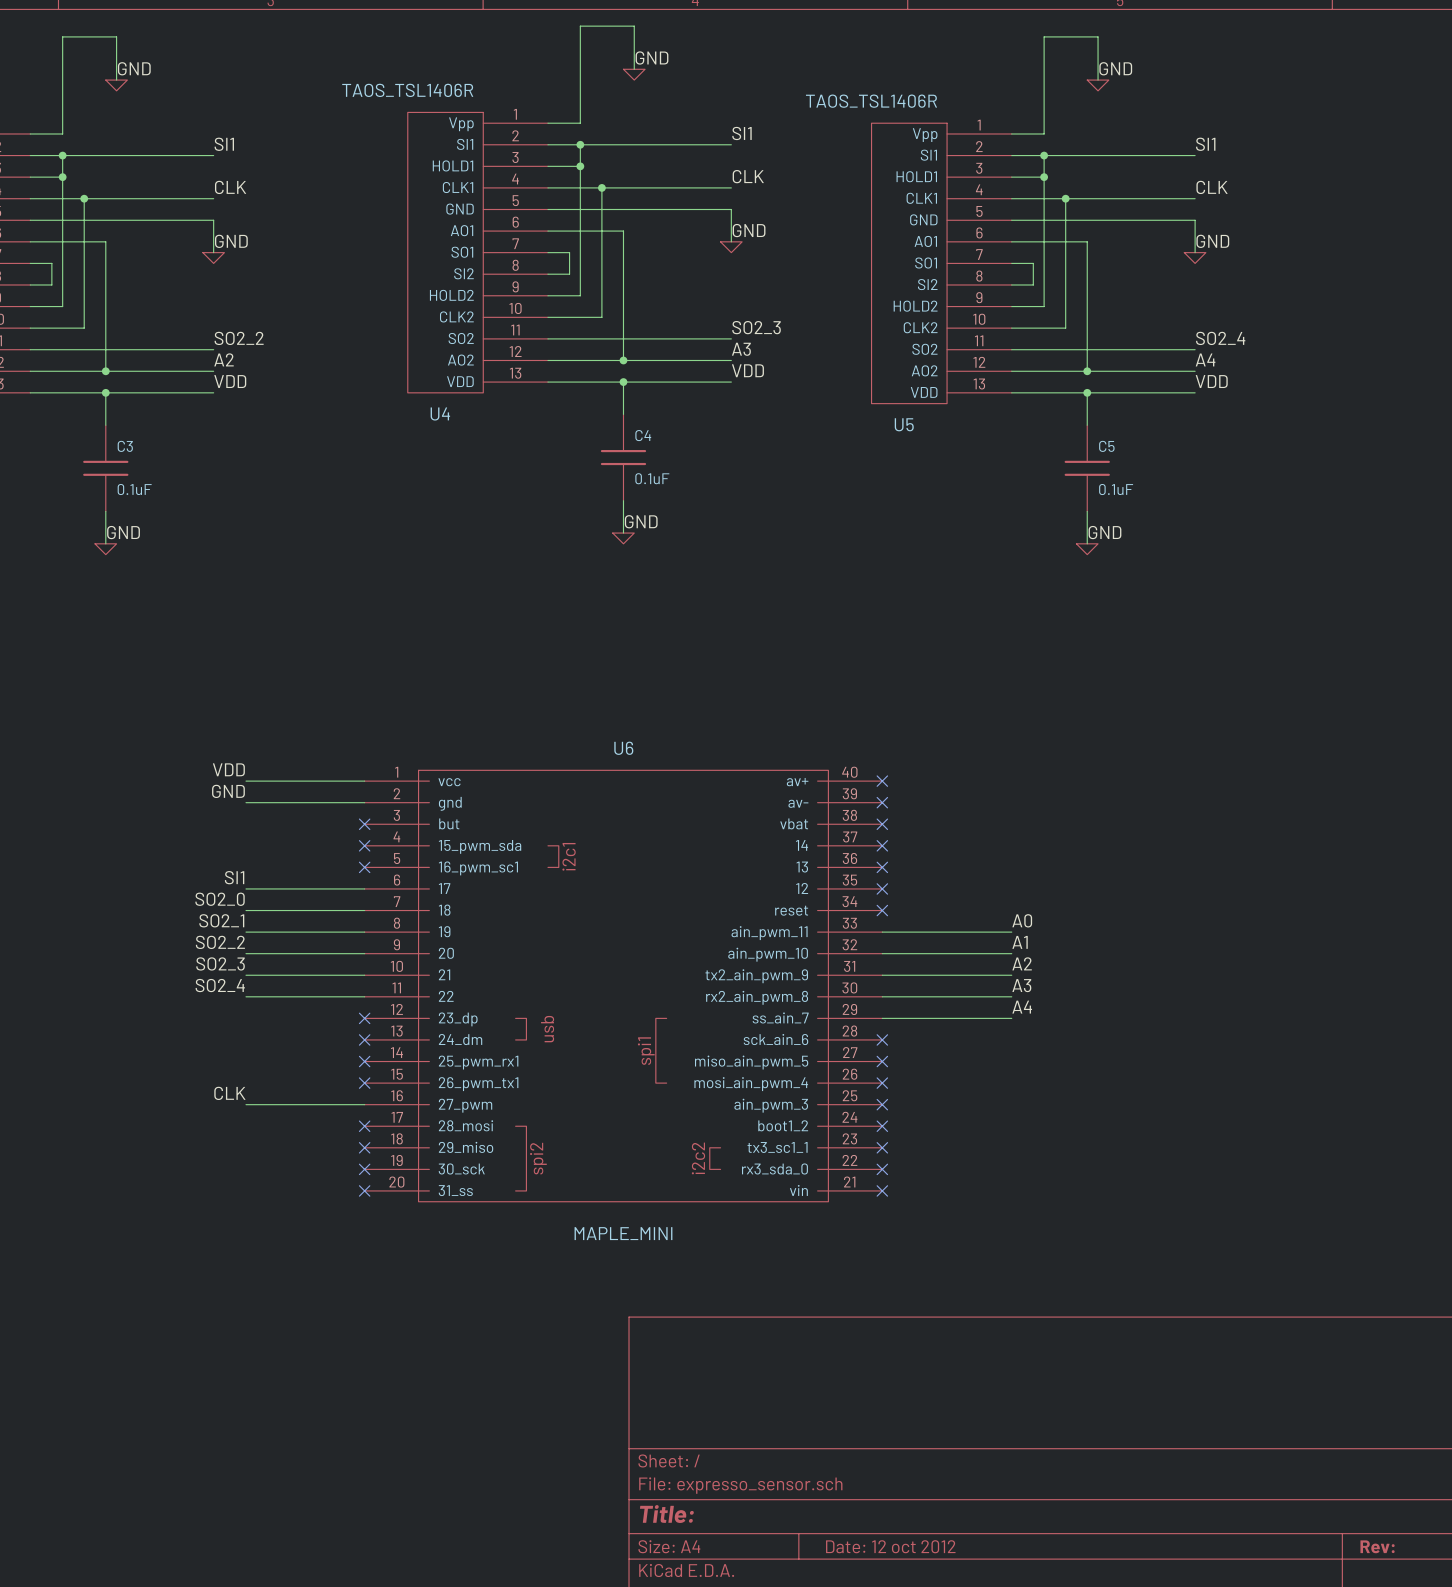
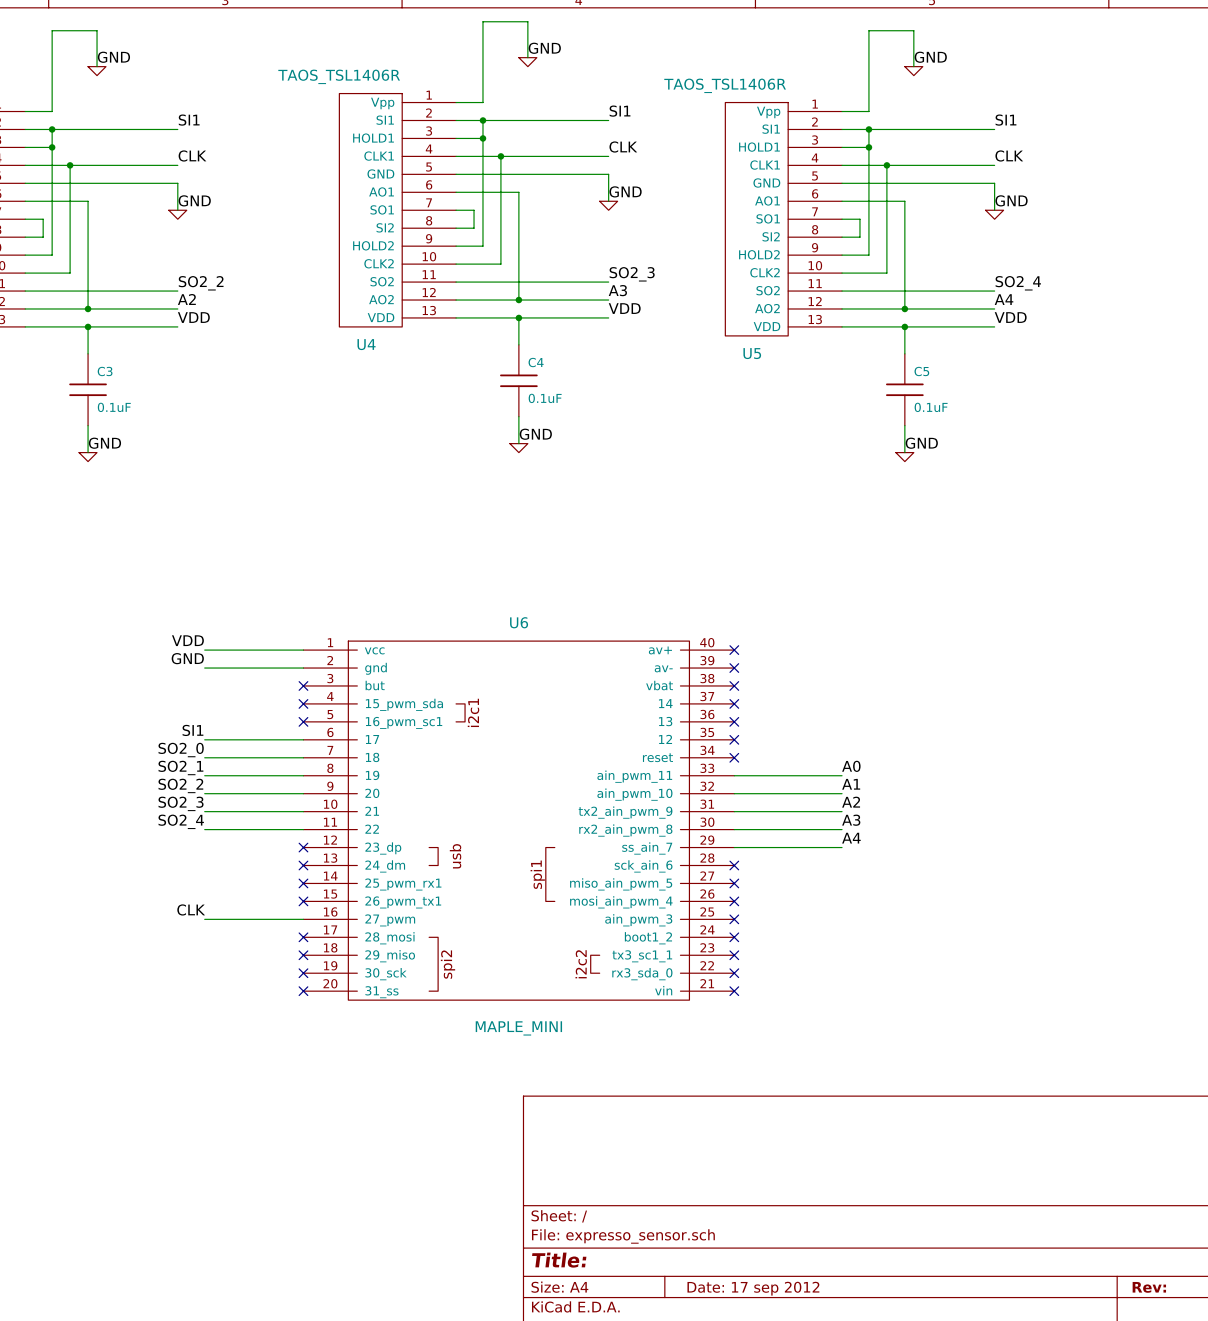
title block: Date: 12 oct 2012 (890, 1546) -> Date: 17 sep 2012 (753, 1288)

